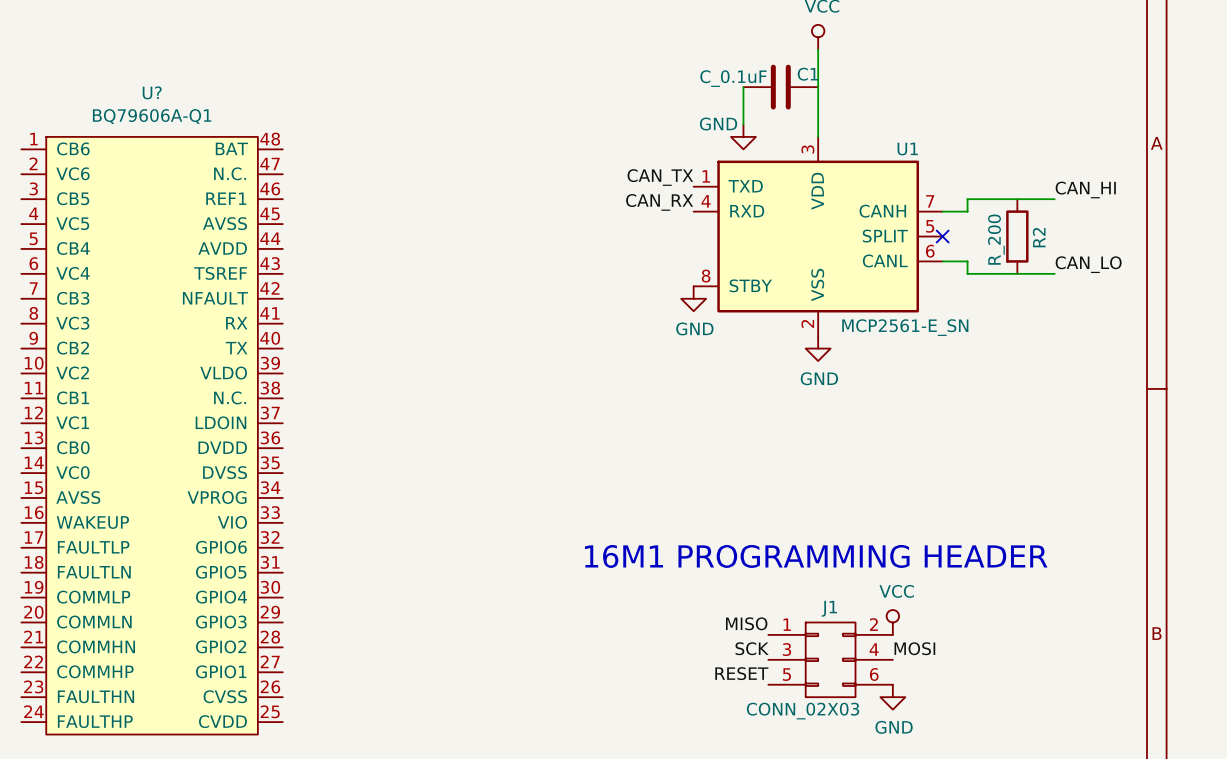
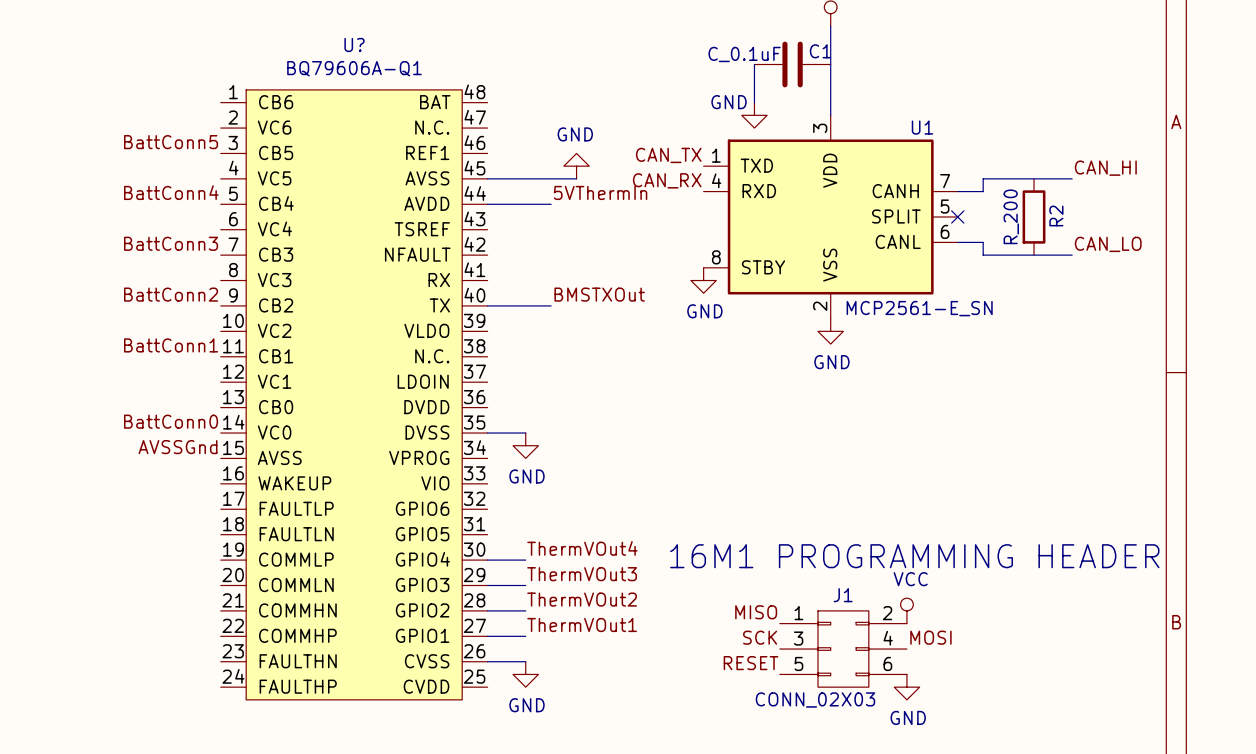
label: none -> BattConn5 (171, 142)
power symbol: none -> GND (576, 166)
wire: none -> (487, 178) (576, 178)
label: none -> BattConn4 (171, 192)
label: none -> 5VThermIn (600, 192)
wire: none -> (487, 204) (551, 204)
label: none -> BattConn3 (171, 243)
label: none -> BattConn2 (171, 294)
label: none -> BMSTXOut (599, 294)
wire: none -> (487, 305) (551, 305)
label: none -> BattConn1 (171, 345)
U? position: (152, 435) -> (354, 394)
label: none -> BattConn0 (171, 421)
wire: none -> (487, 433) (525, 433)
power symbol: none -> GND (525, 445)
label: none -> AVSSGnd (178, 447)
text position: 16M1 PROGRAMMING HEADER (816, 556) -> 16M1 PROGRAMMING HEADER (914, 556)
label: none -> ThermVOut4 (582, 548)
wire: none -> (487, 560) (525, 560)
label: none -> ThermVOut3 (582, 574)
wire: none -> (487, 585) (525, 585)
label: none -> ThermVOut2 (582, 599)
wire: none -> (487, 610) (525, 610)
label: none -> ThermVOut1 (582, 624)
wire: none -> (487, 636) (525, 636)
wire: none -> (487, 661) (525, 661)
power symbol: none -> GND (525, 674)

